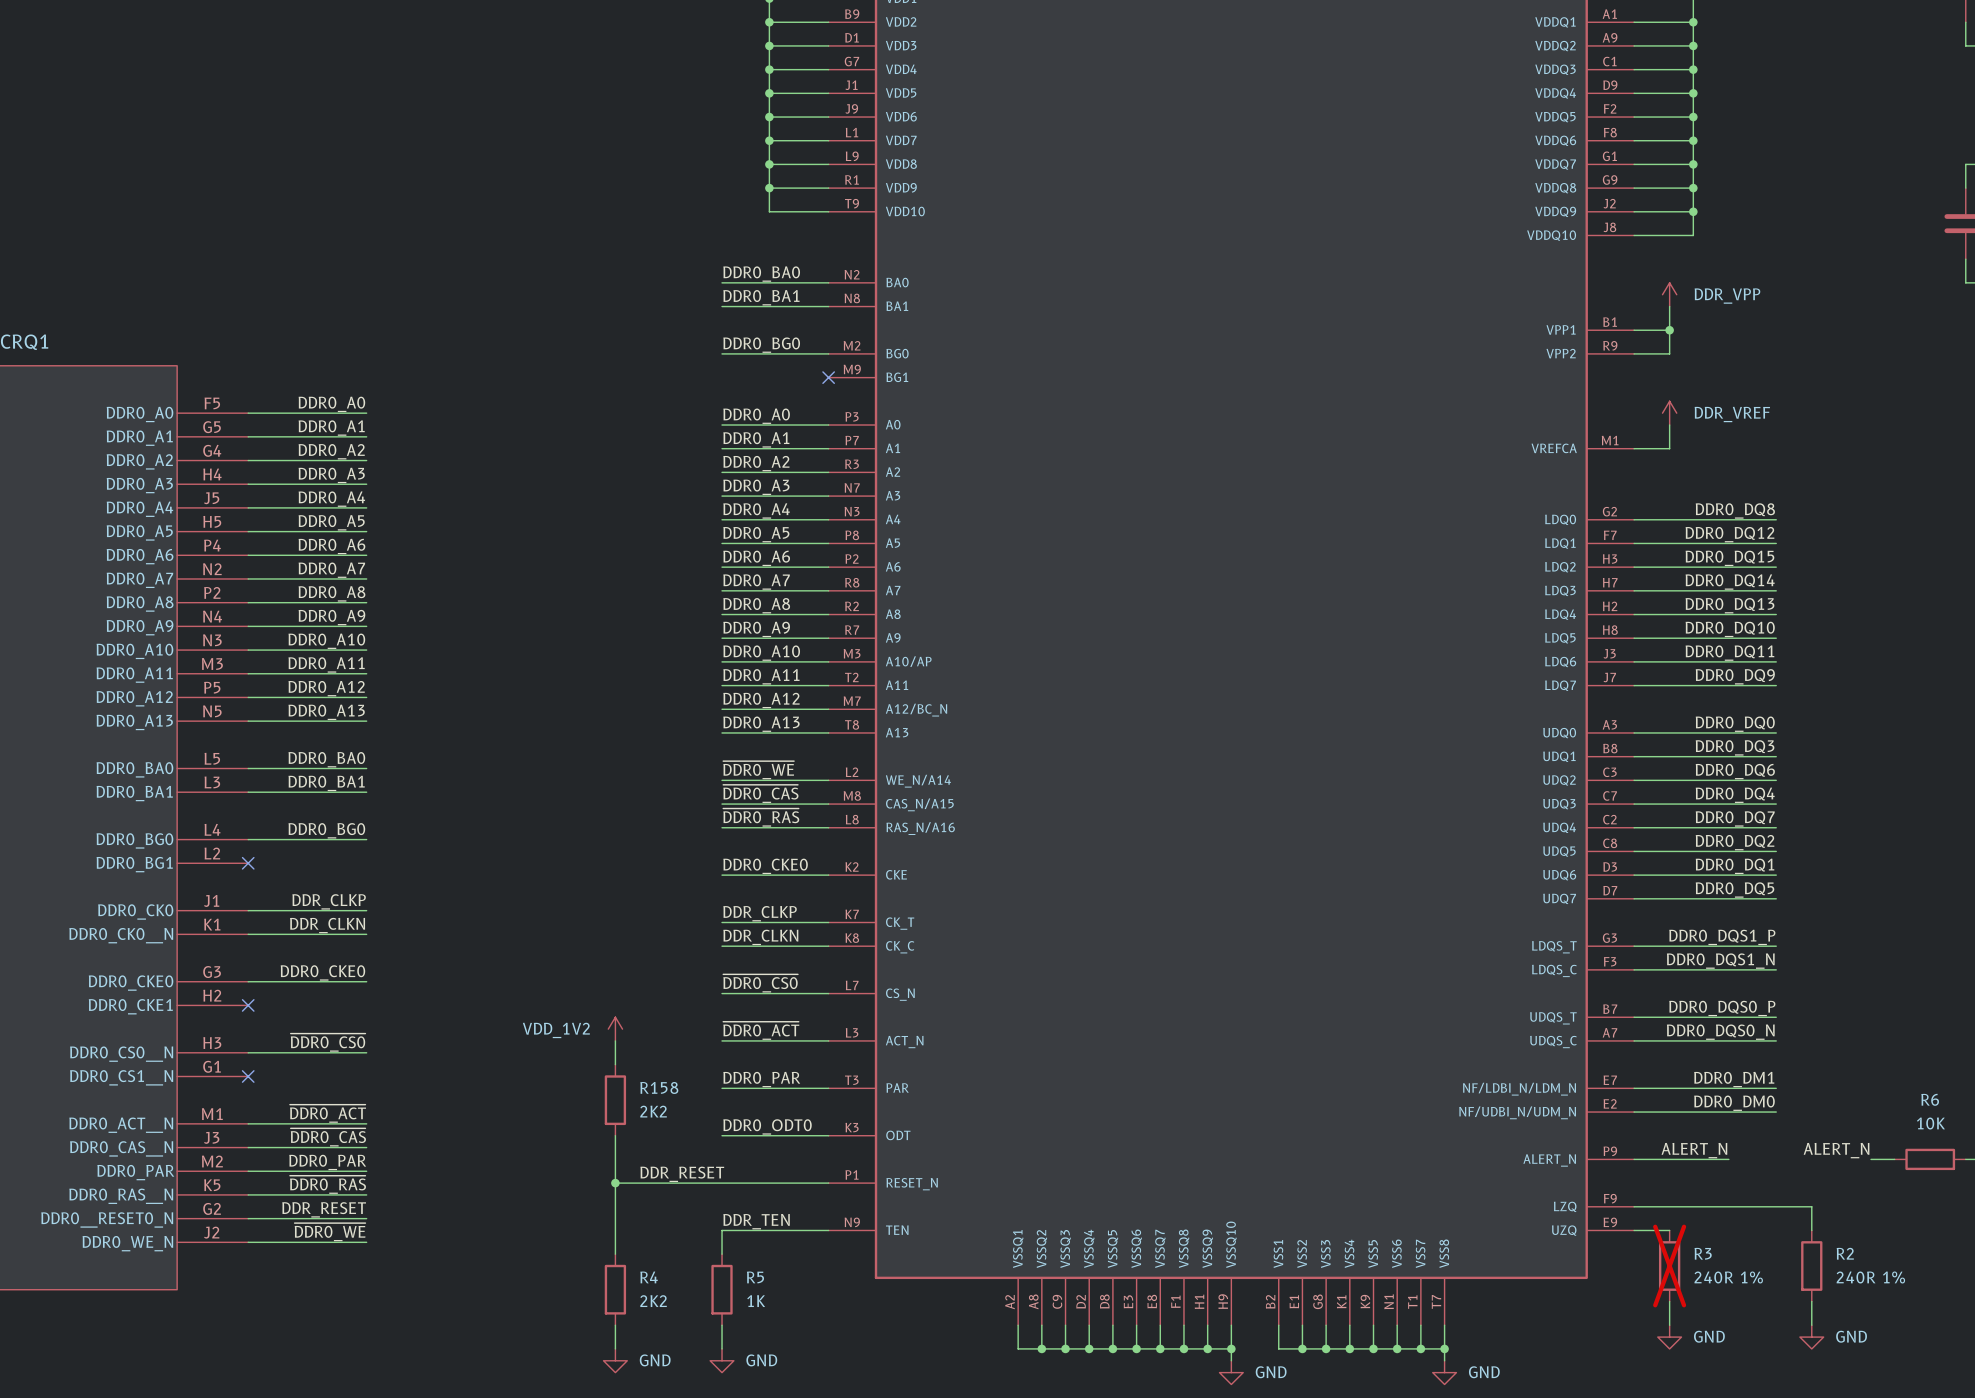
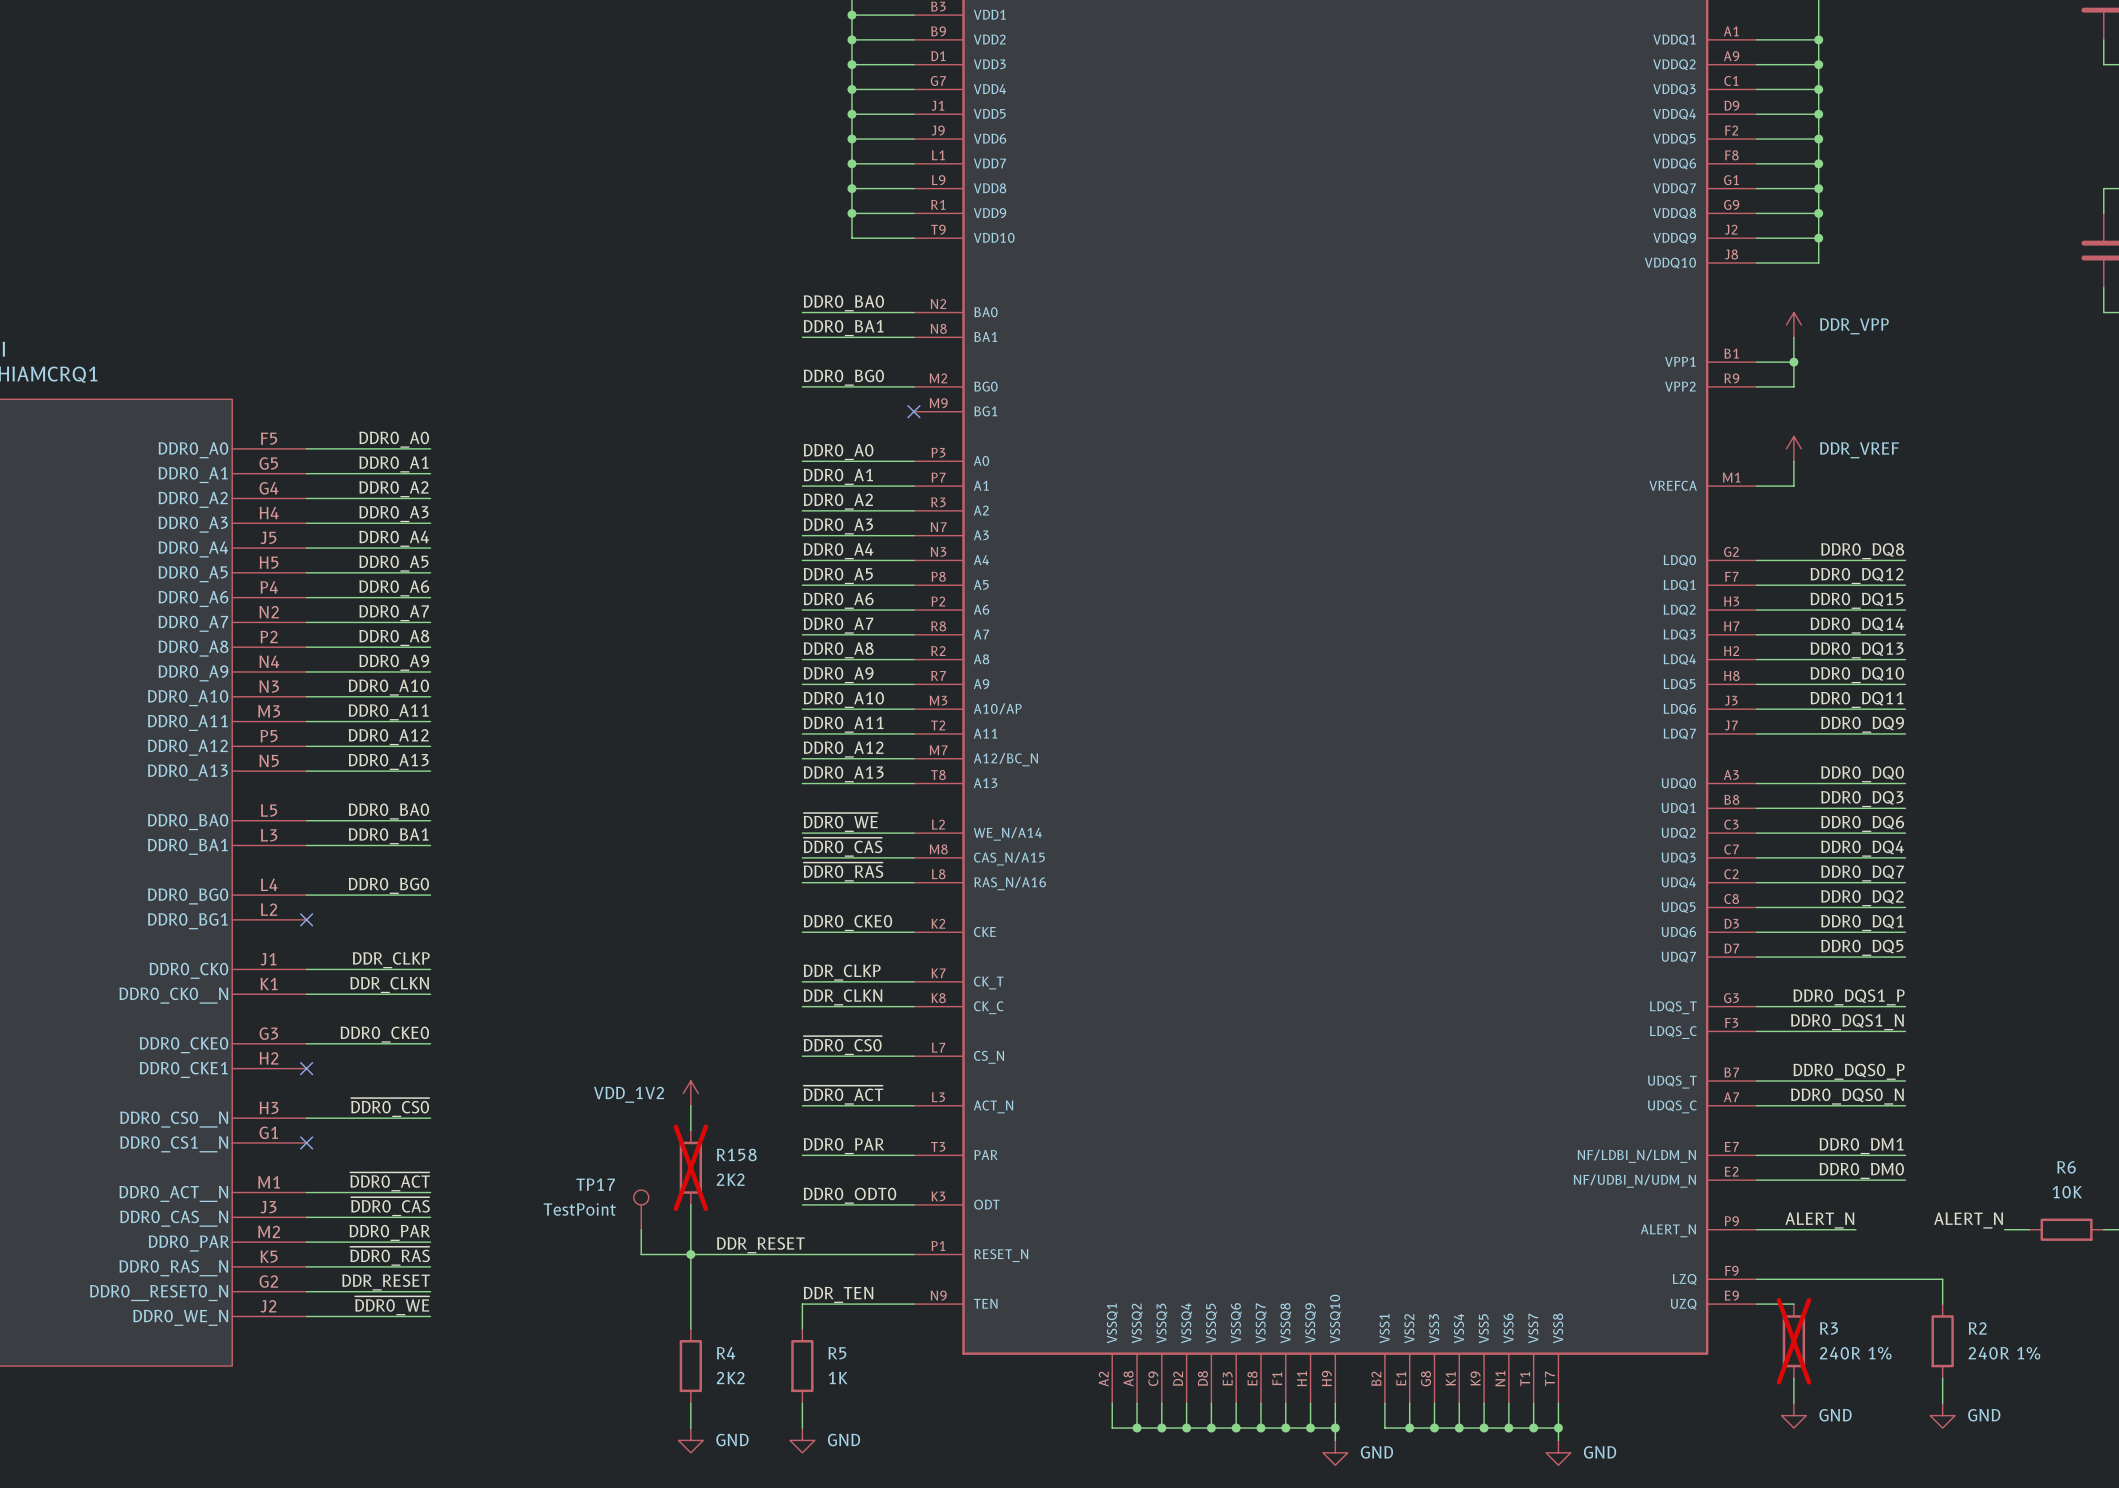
R158 do-not-place cross: none -> (690, 1167)
TP17: none -> TestPoint (641, 1209)
wire: none -> (641, 1229) (641, 1254) (690, 1254)

